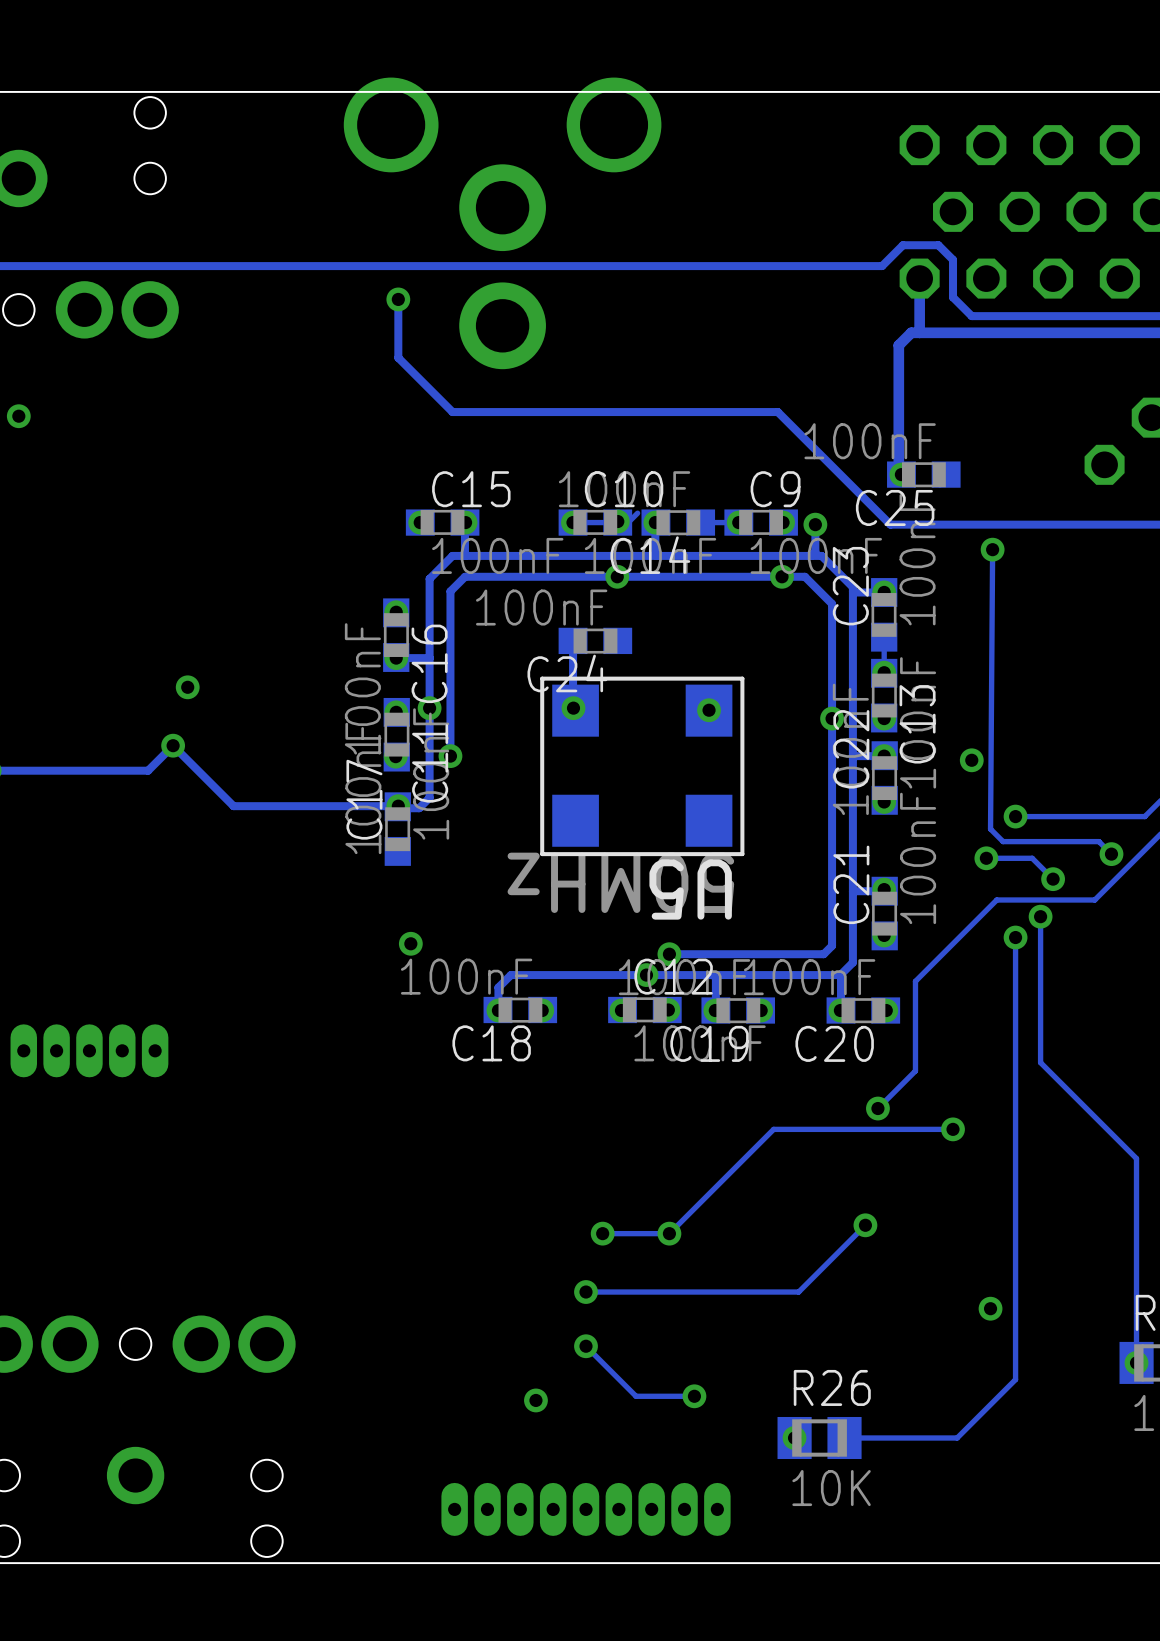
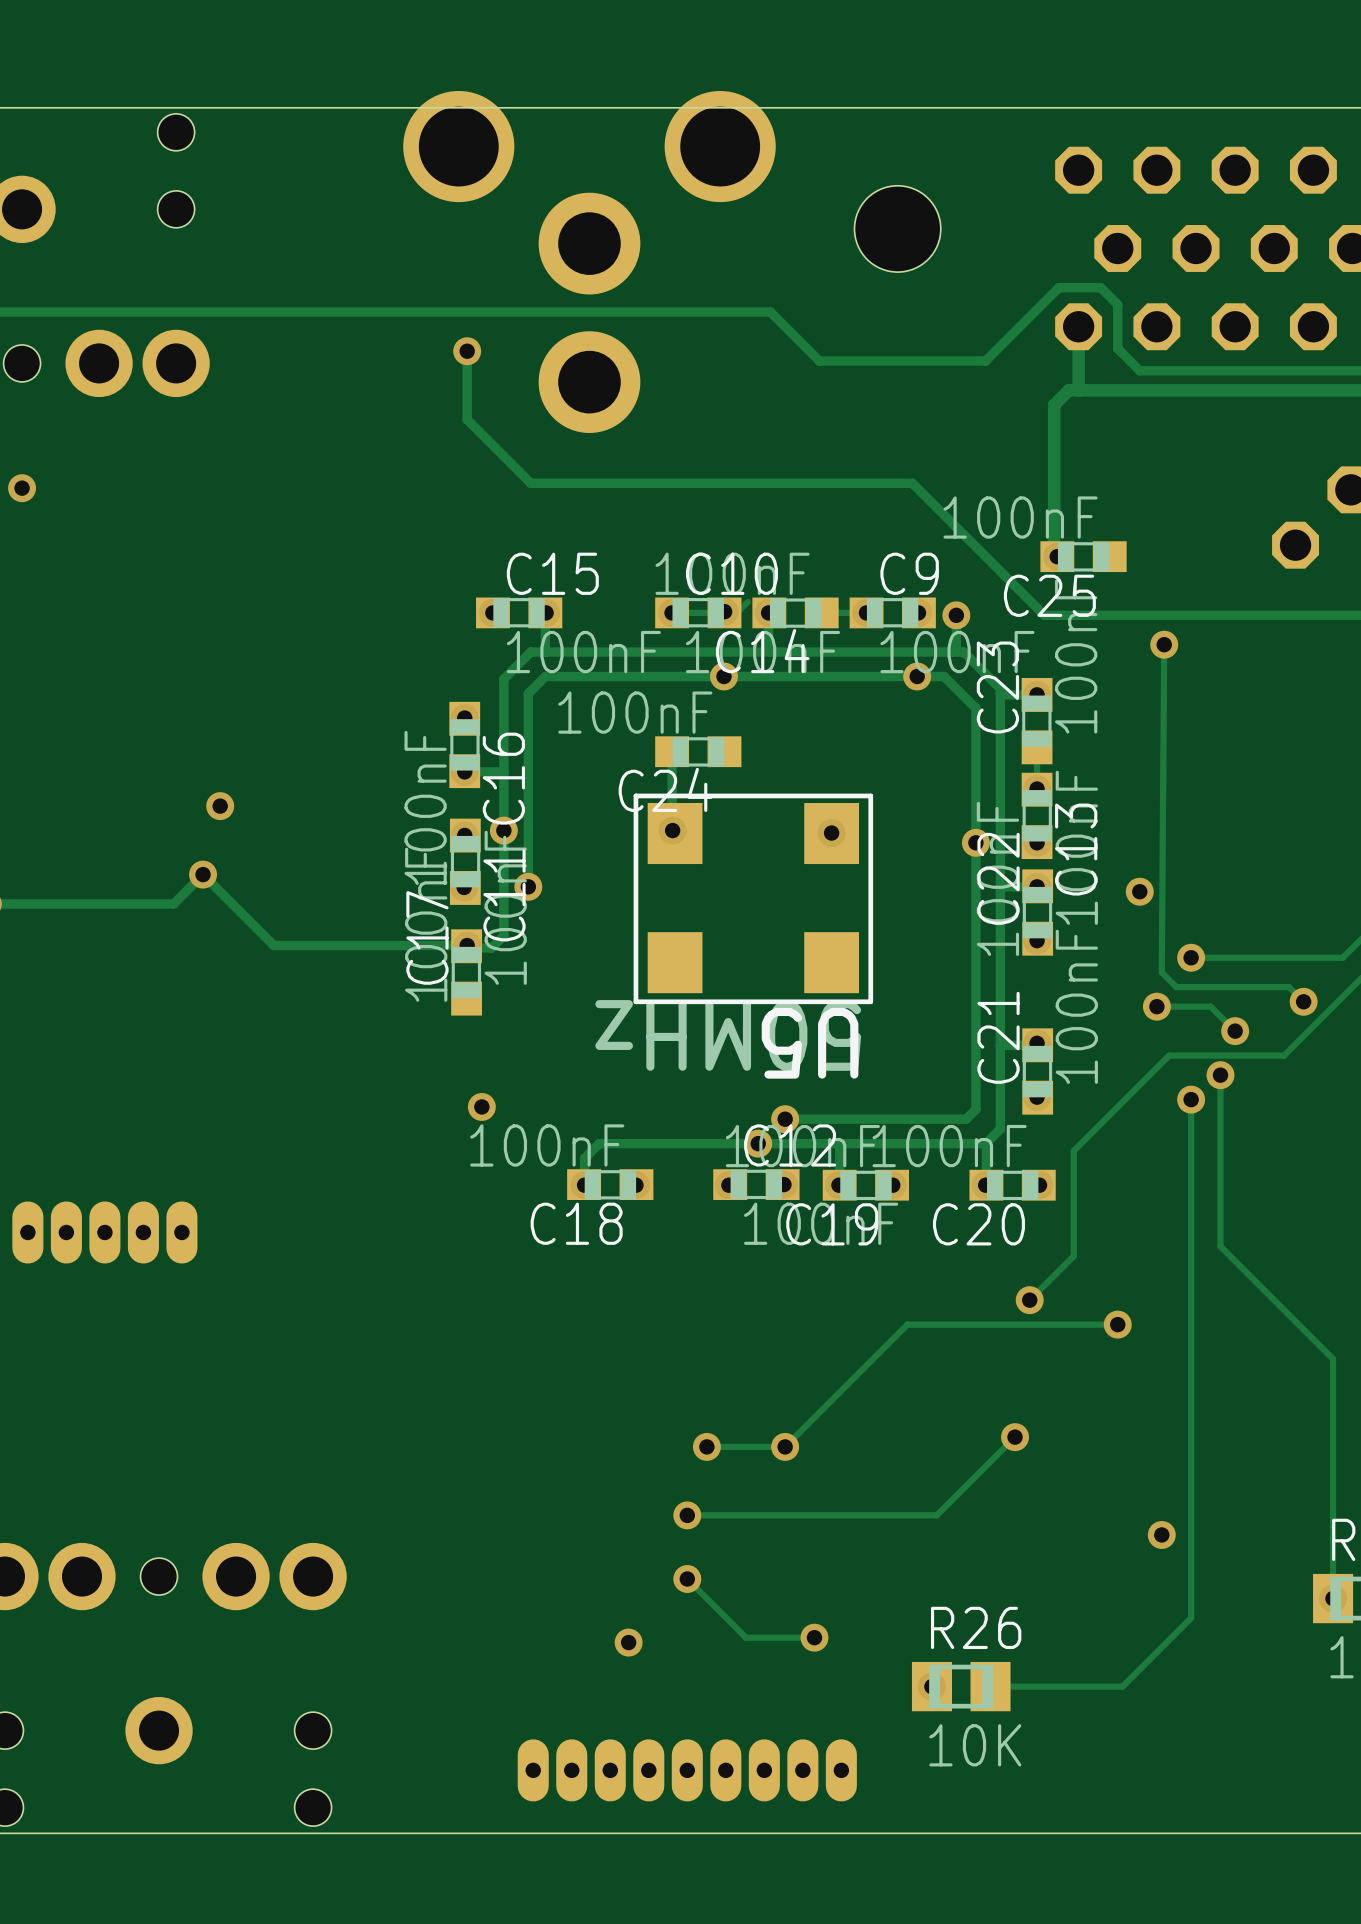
part: none -> (897, 228)
track: (882, 266) (656, 266) -> (1034, 312) (985, 360) (819, 360) (770, 312)

